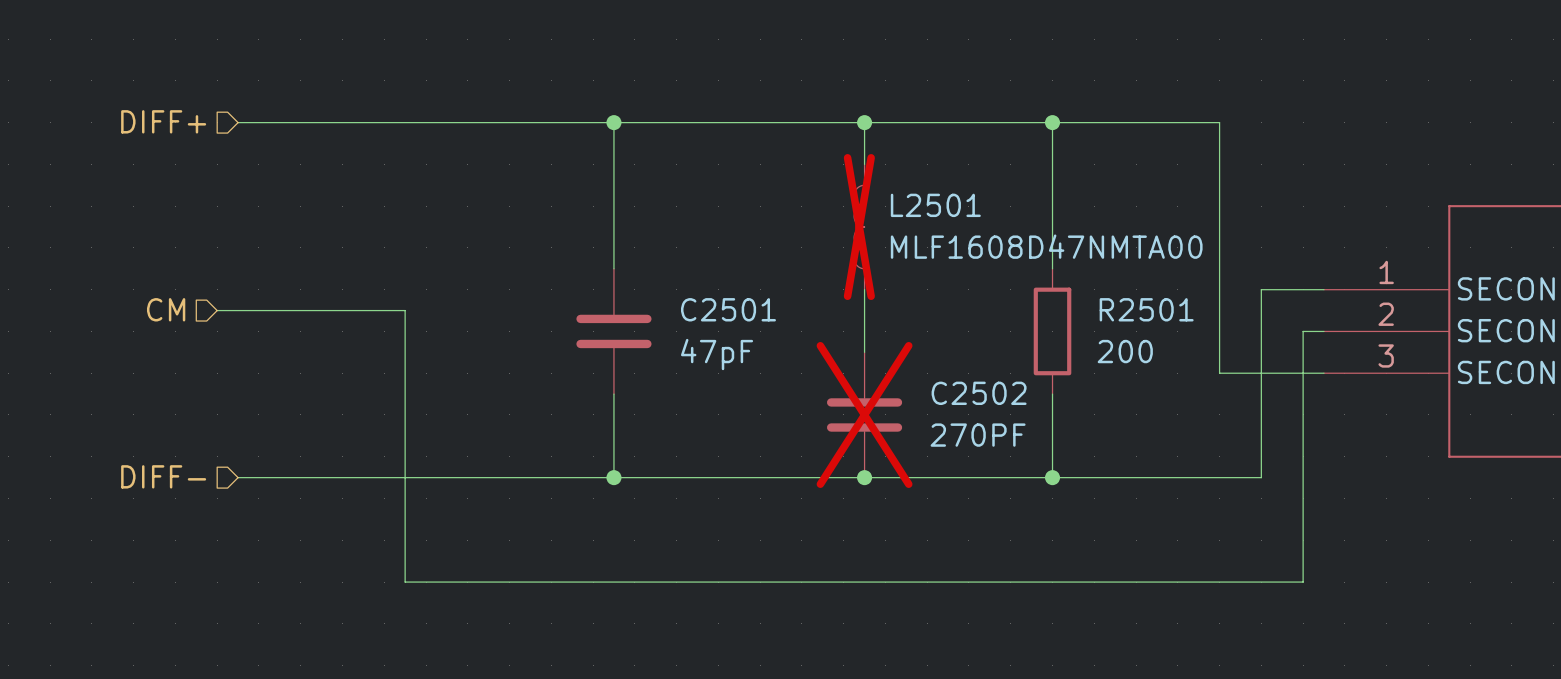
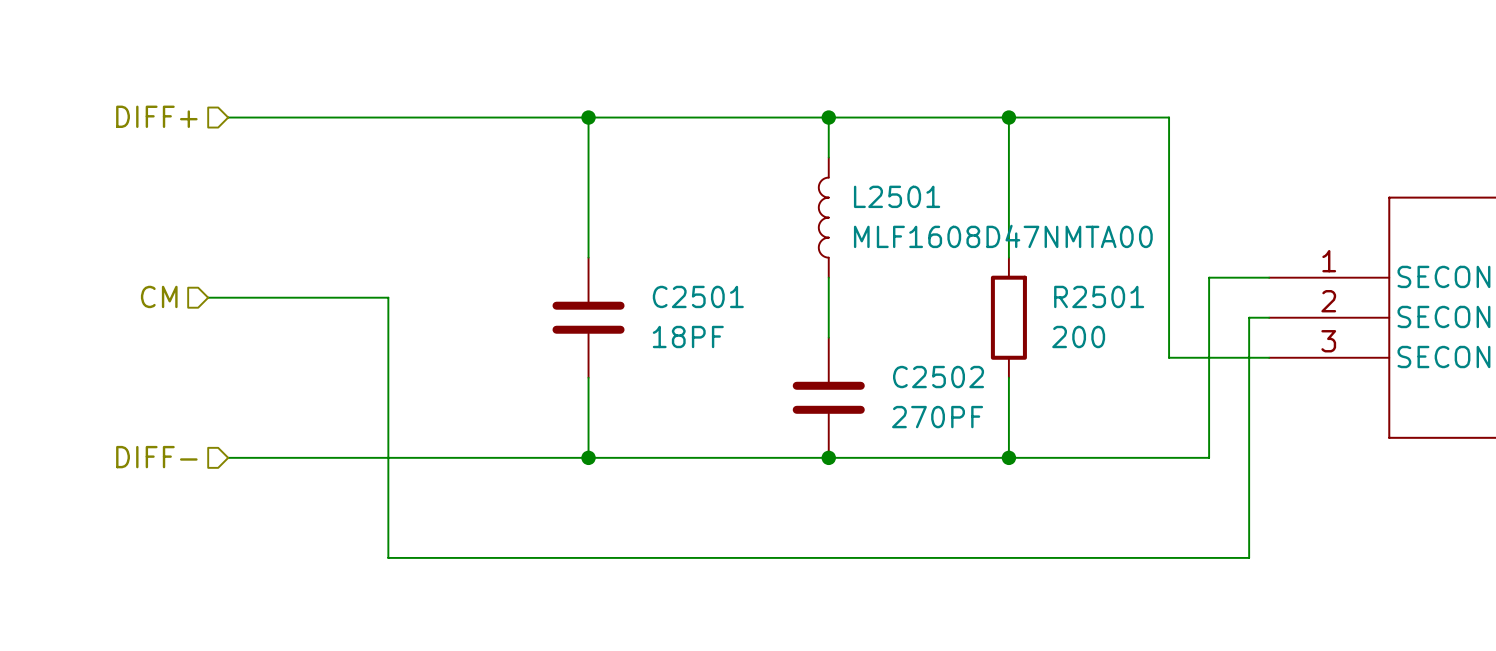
L2501 do-not-place cross: (859, 227) -> none
C2501 value: 47pF (717, 354) -> 18PF (688, 336)
C2502 do-not-place cross: (864, 414) -> none

